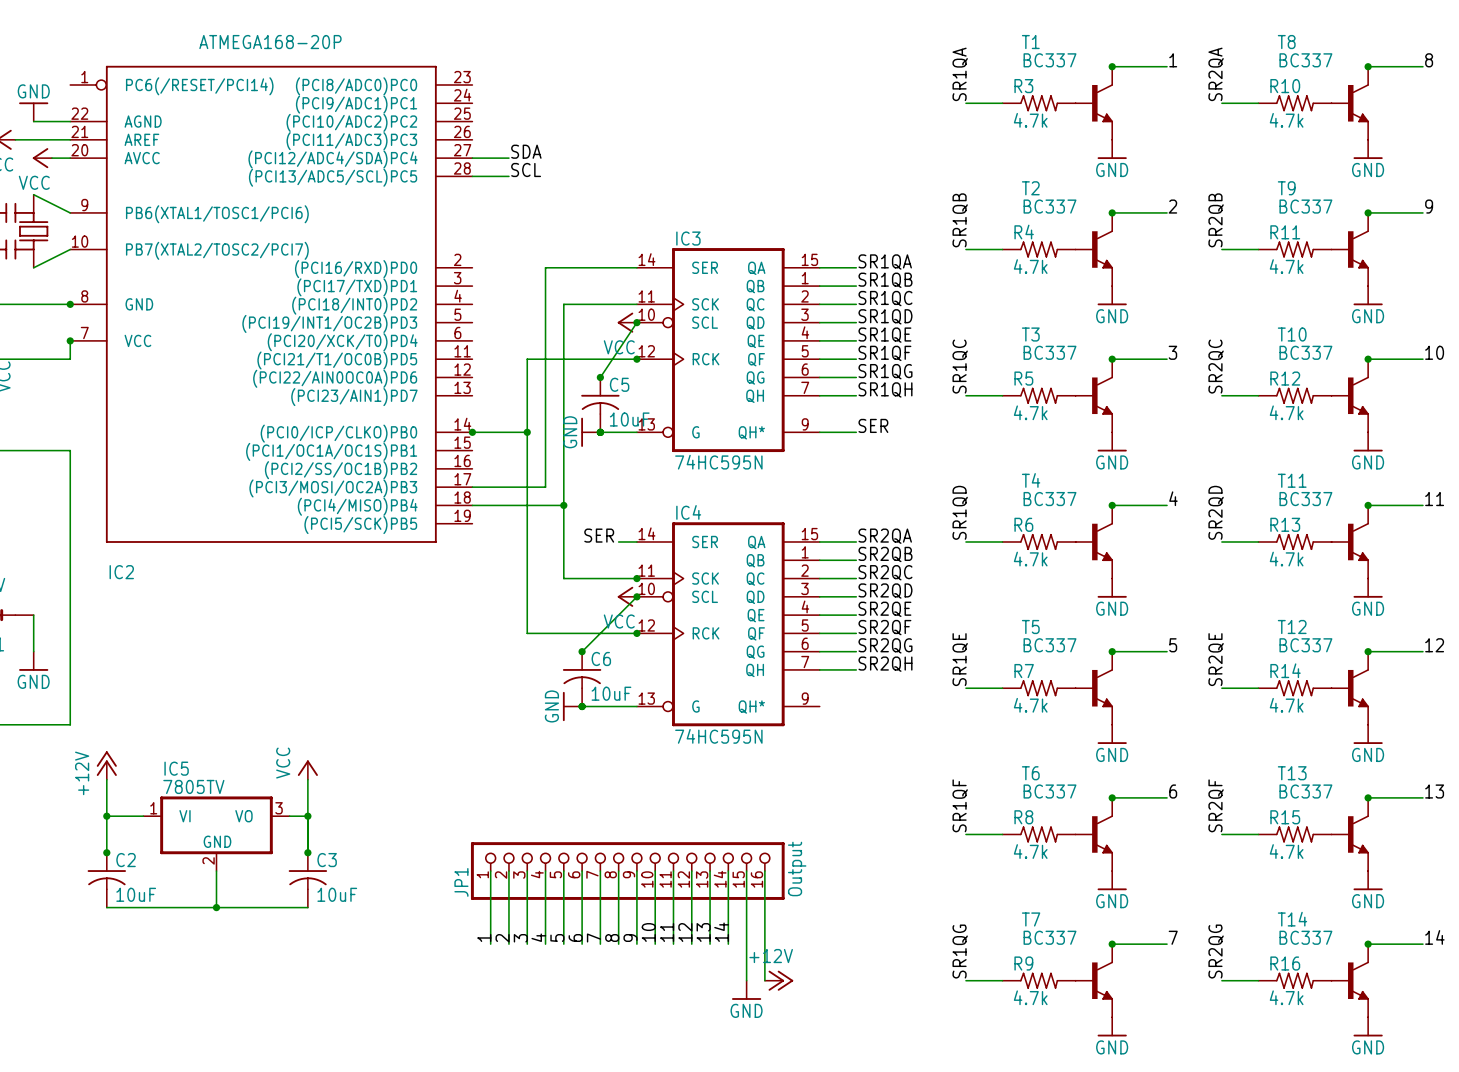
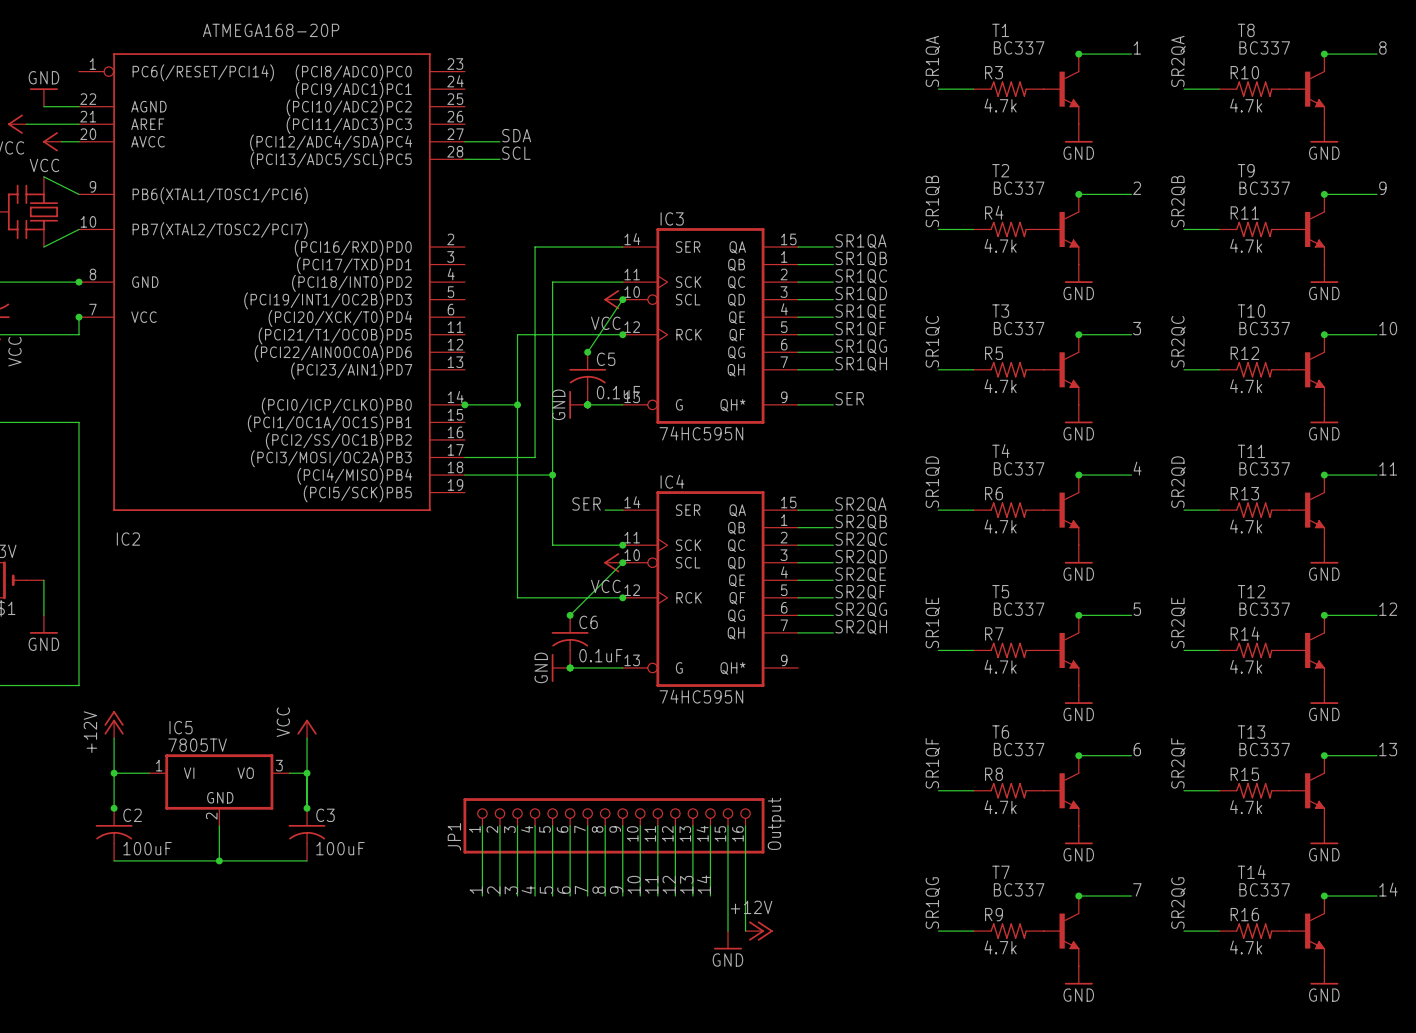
C5 value: 10uF (629, 419) -> 0.1uF (618, 392)
C6 value: 10uF (611, 693) -> 0.1uF (600, 655)
C2 value: 10uF (136, 894) -> 100uF (147, 848)
C3 value: 10uF (337, 894) -> 100uF (340, 848)

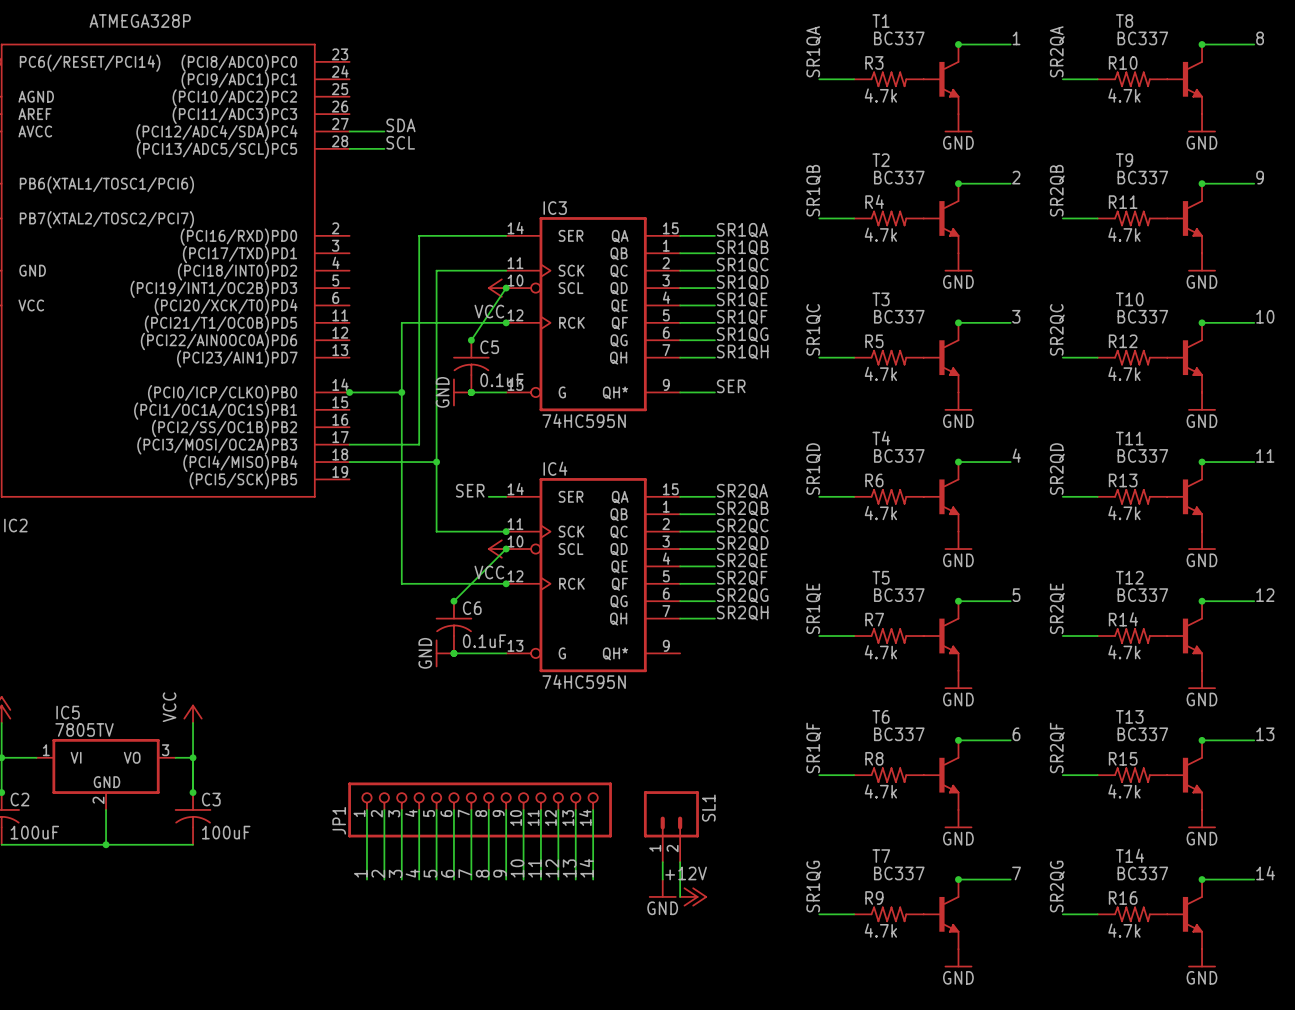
IC2 value: ATMEGA168-20P (271, 30) -> ATMEGA328P (140, 21)
JP1 symbol: [463, 798, 765, 854] -> [348, 782, 612, 838]
JP1 value: Output (776, 823) -> none
wire: (727, 825) (727, 931) -> none
wire: (745, 825) (745, 931) -> none
SL1: none -> (671, 826)
wire: none -> (662, 862) (662, 879)
wire: none -> (680, 862) (680, 896)
power symbol position: +12V (759, 931) -> +12V (693, 896)
power symbol position: GND (727, 940) -> GND (662, 888)

